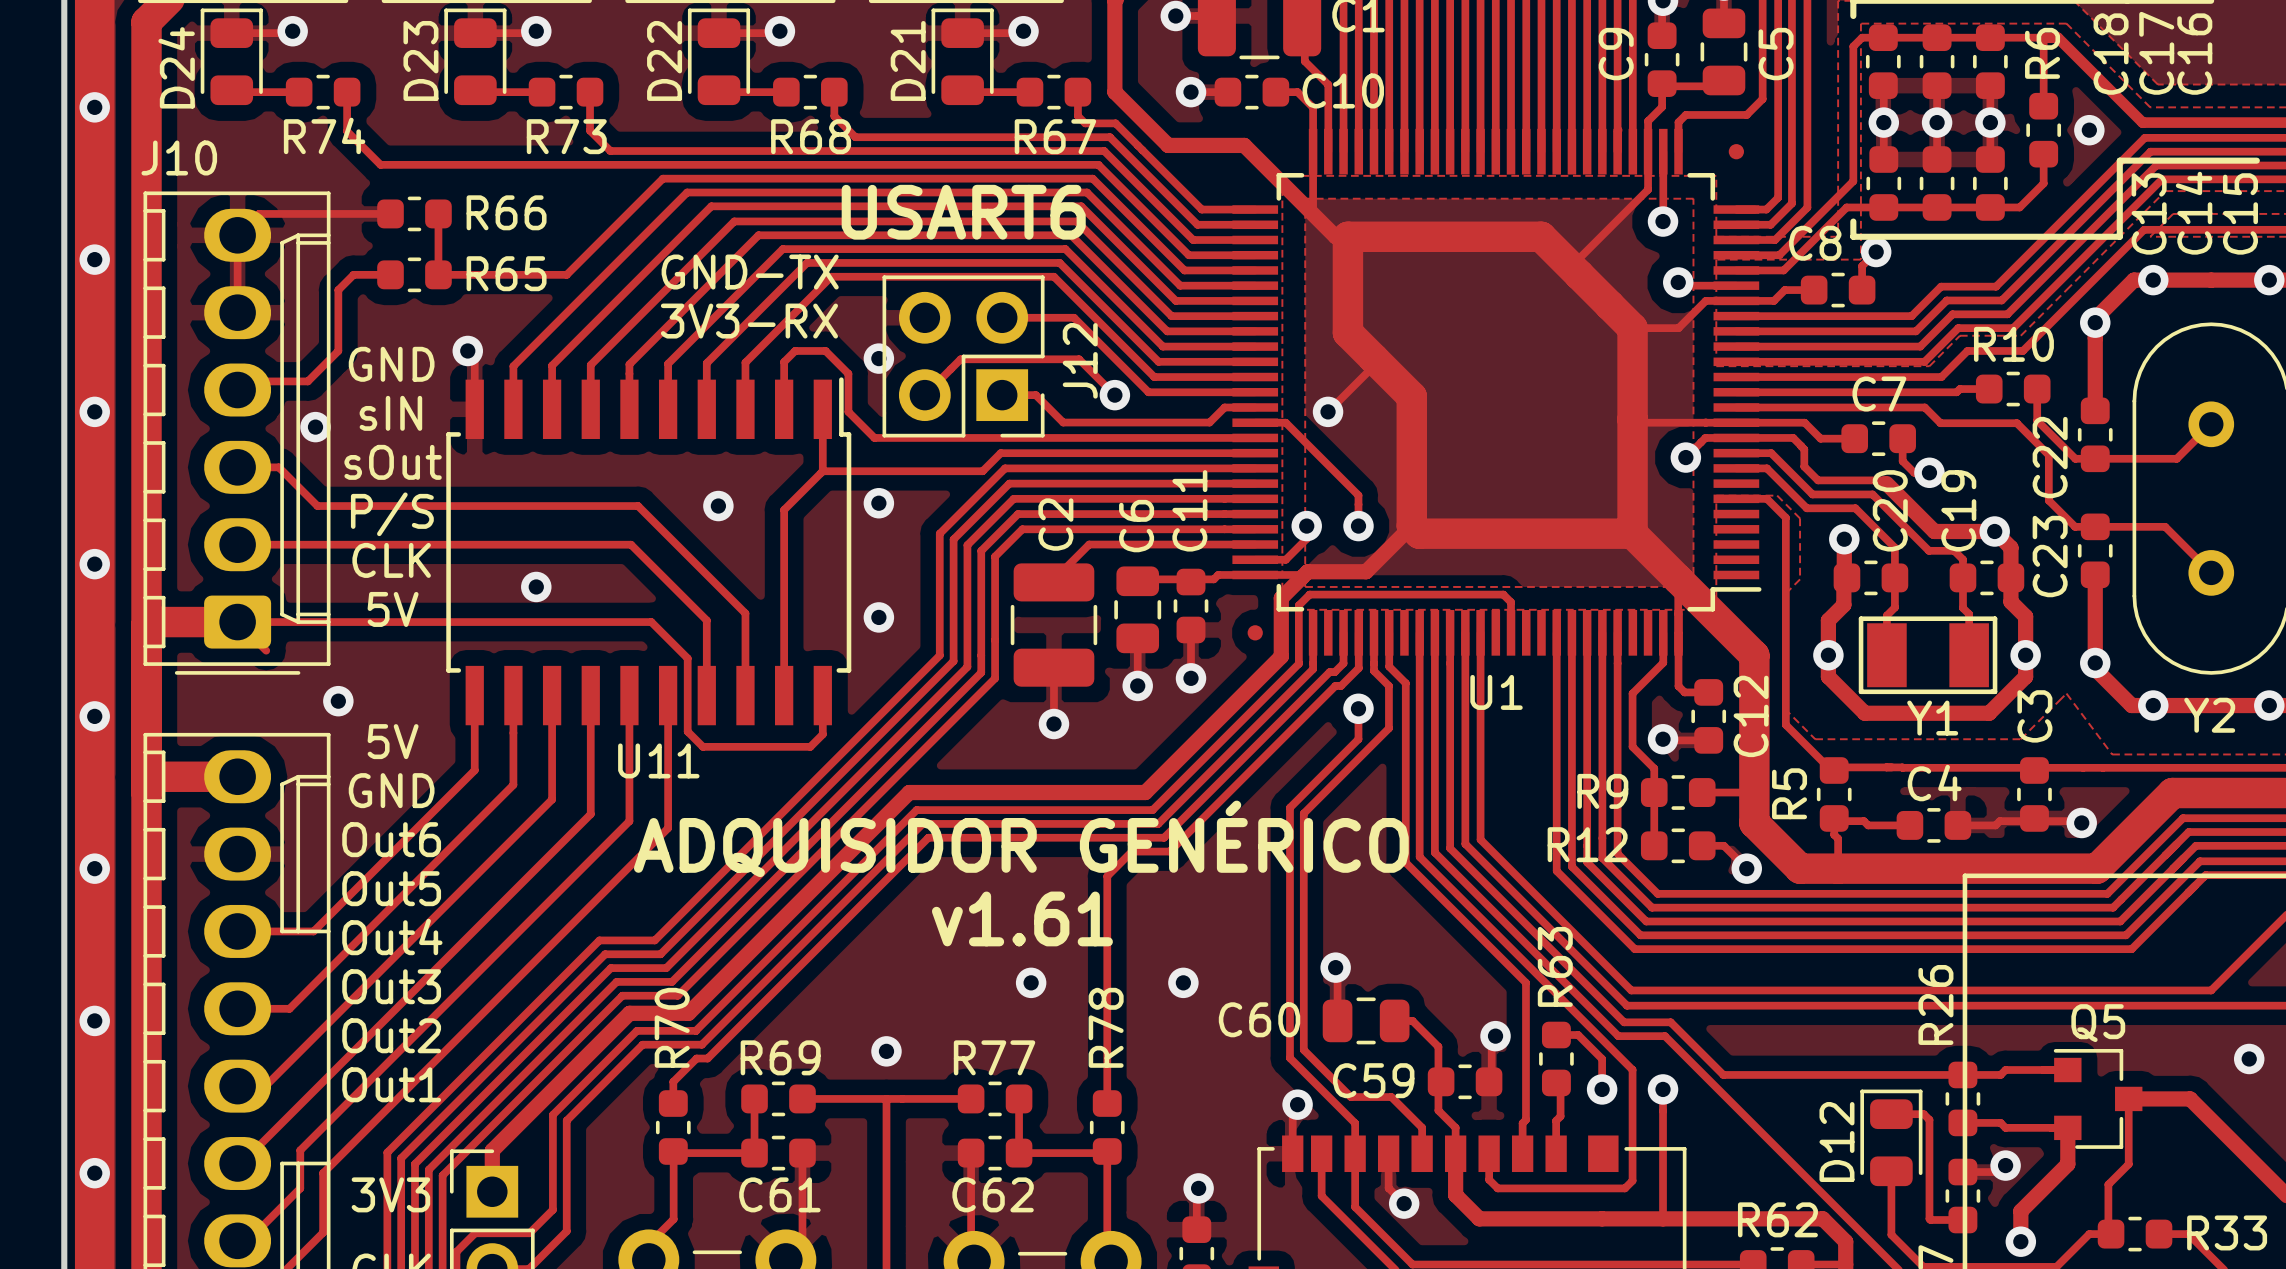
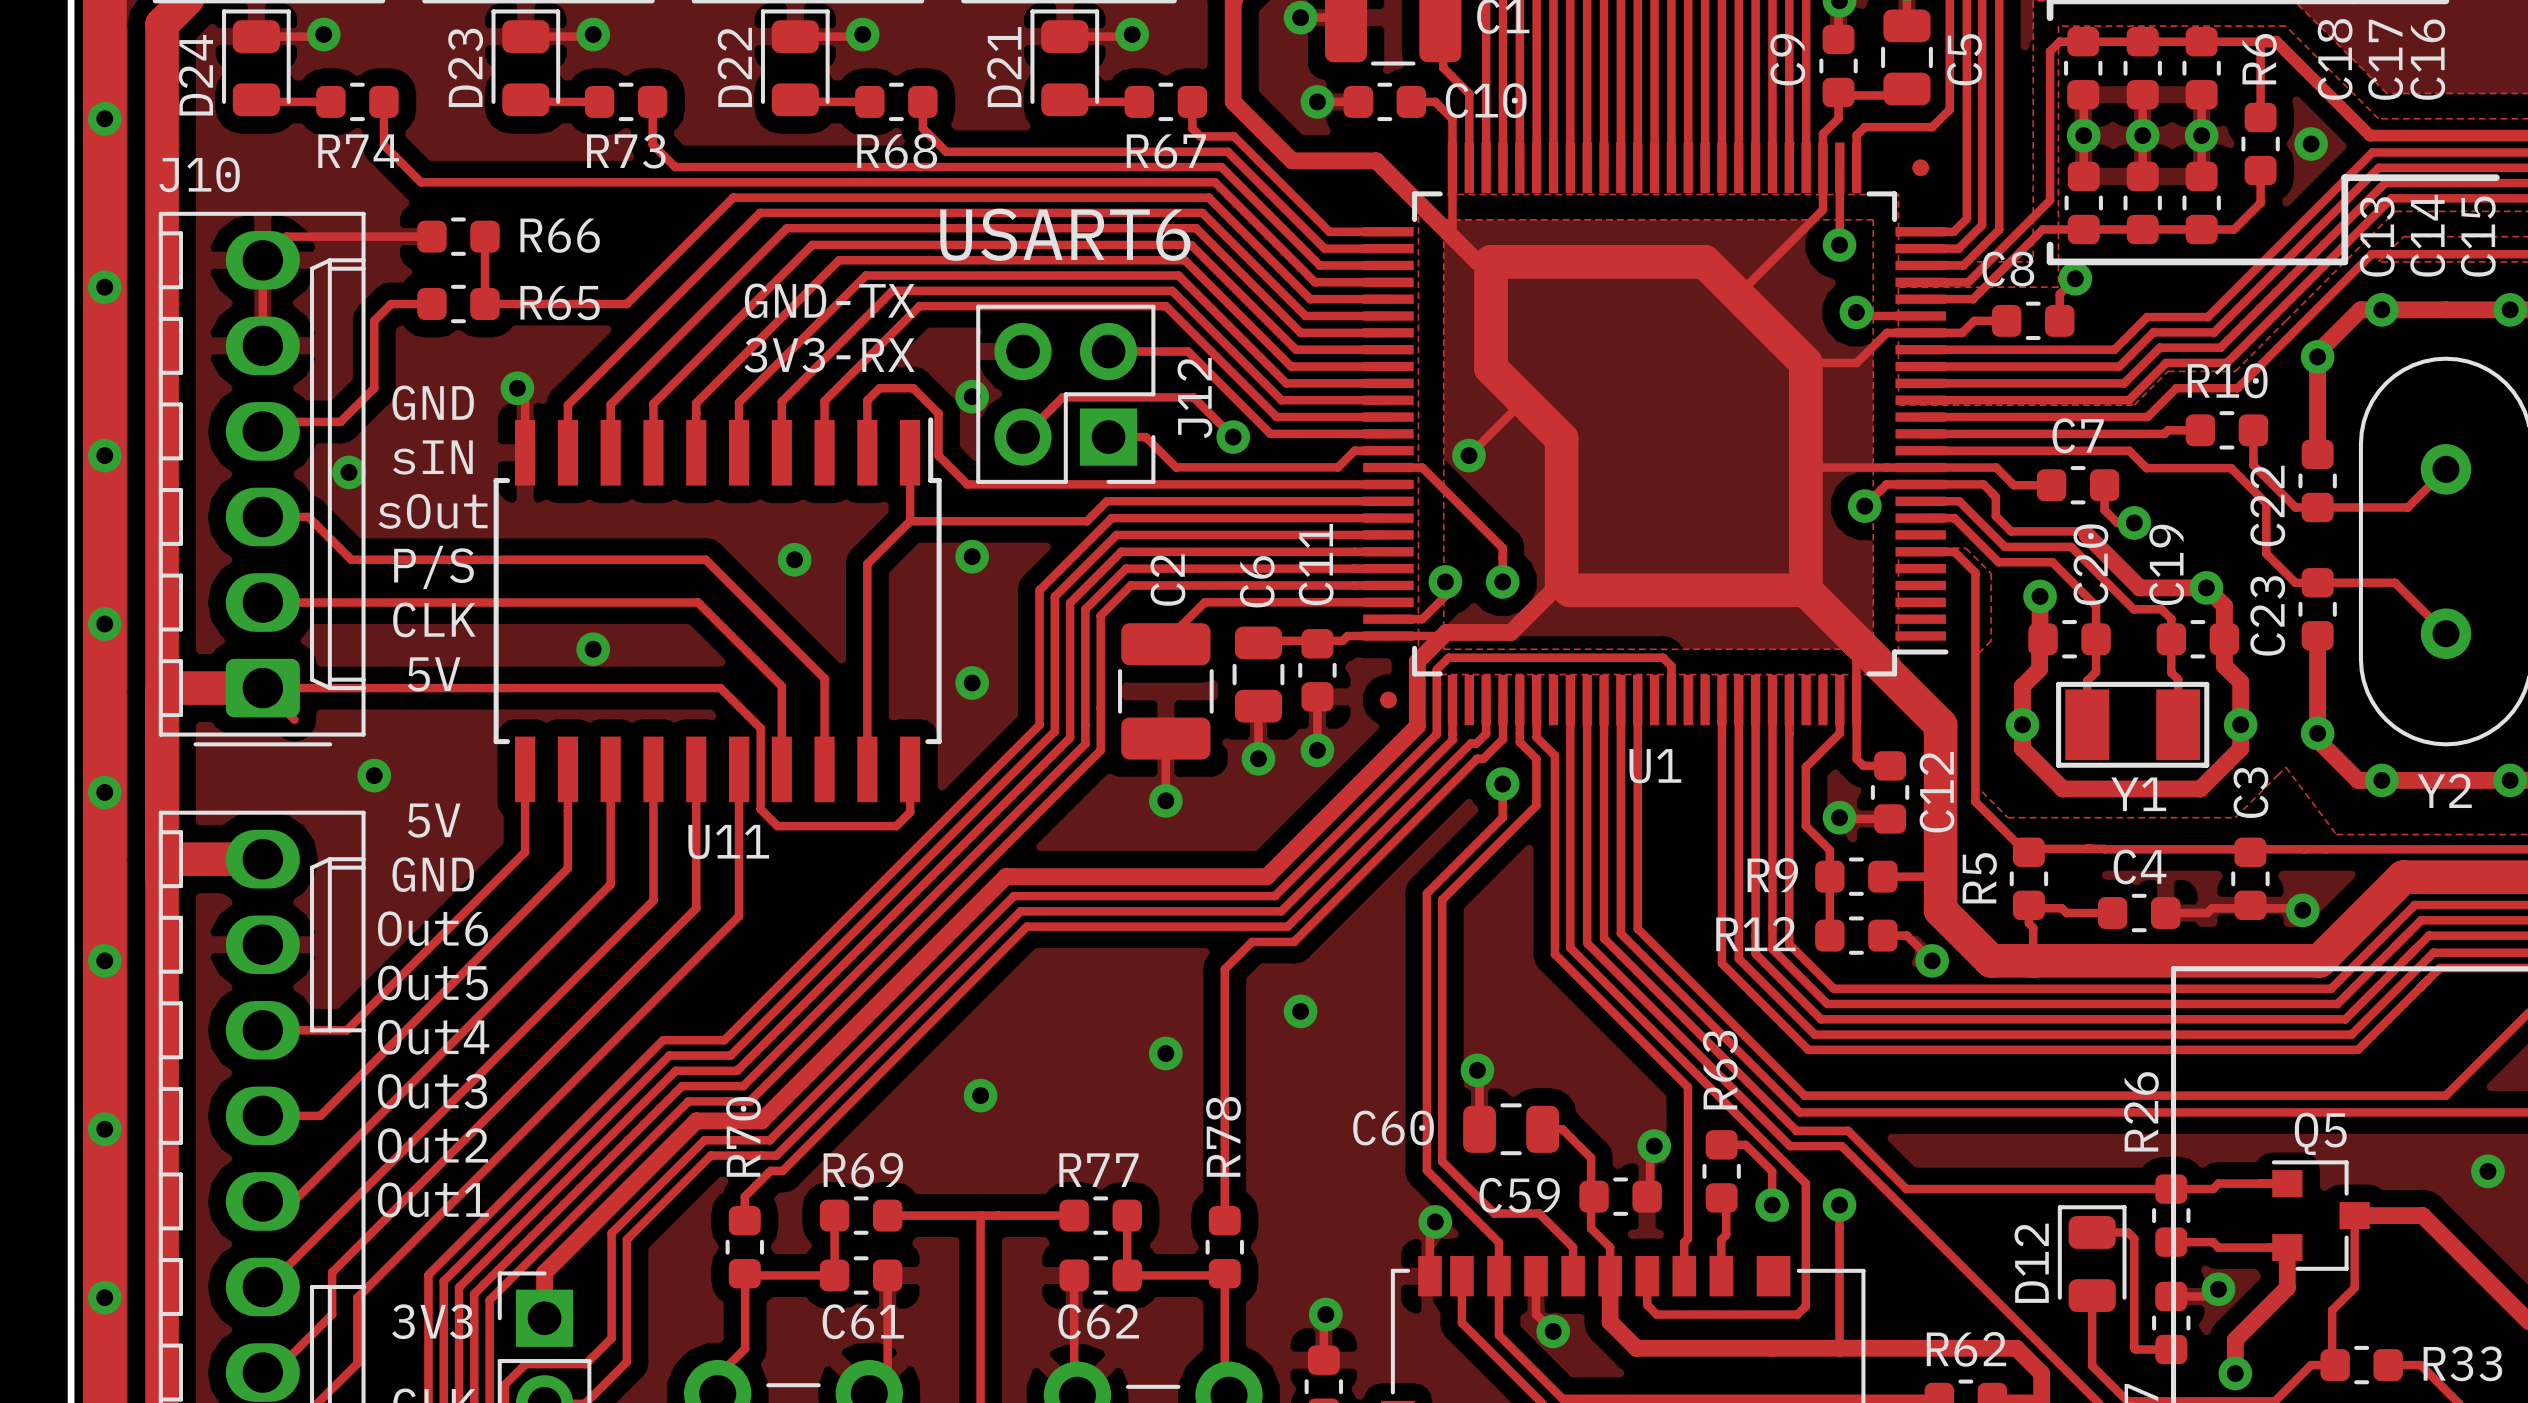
text: ADQUISIDOR GENÉRICO (1021, 838) -> none
via: none -> (1300, 1011)
text: v1.61 (1022, 918) -> none
via position: (1031, 982) -> (1165, 1053)
via: (1183, 982) -> none
via position: (886, 1051) -> (980, 1095)

